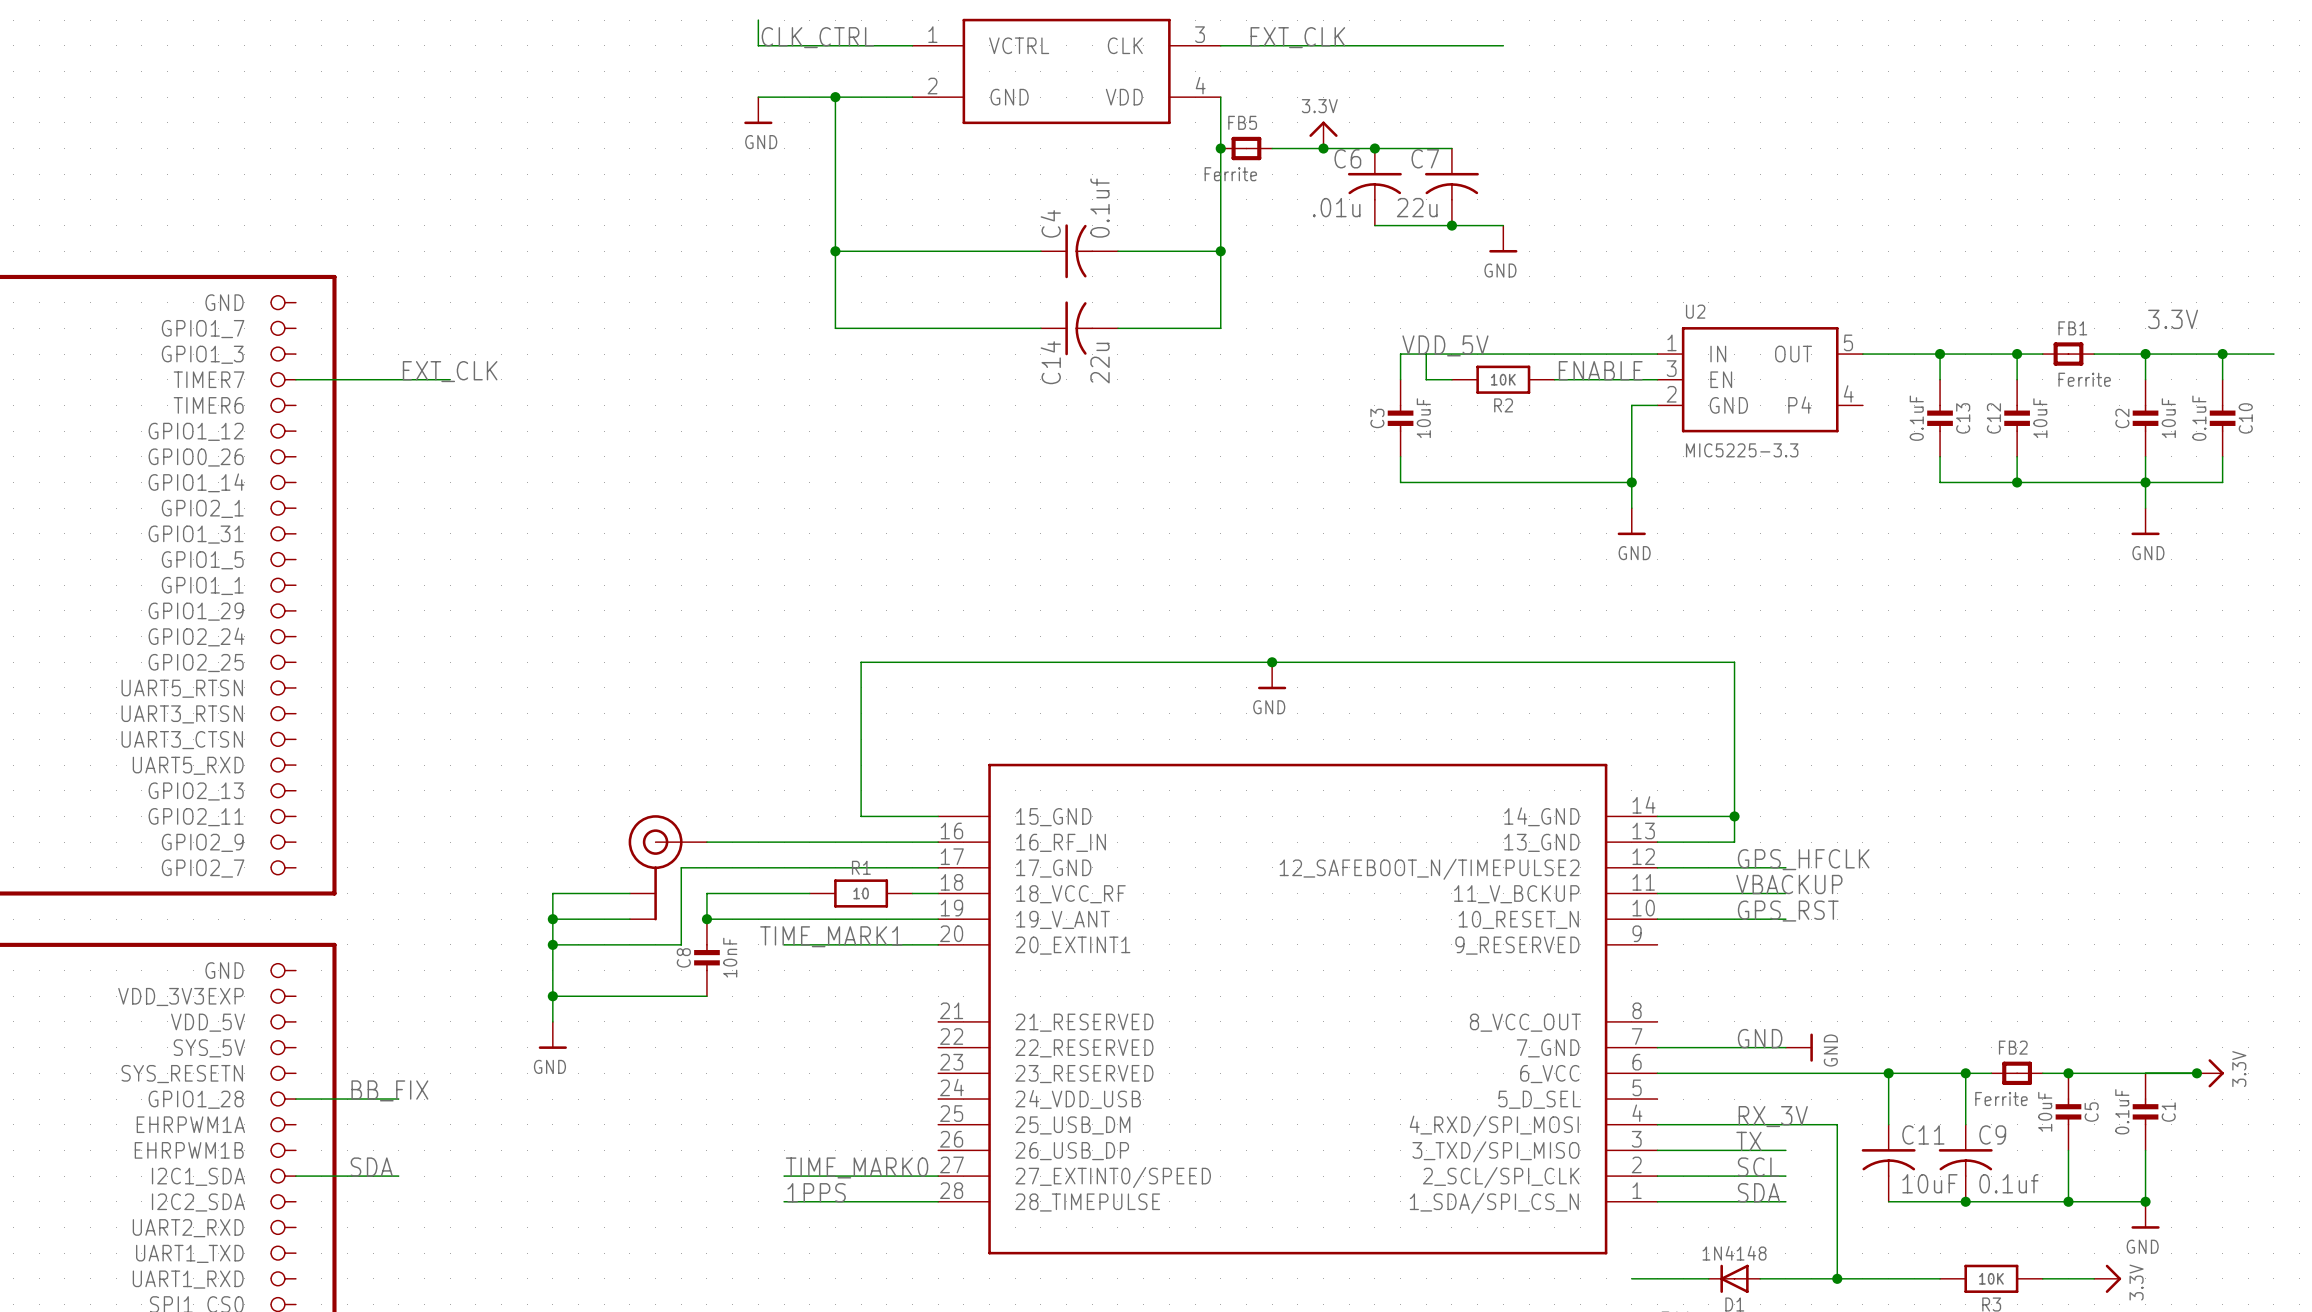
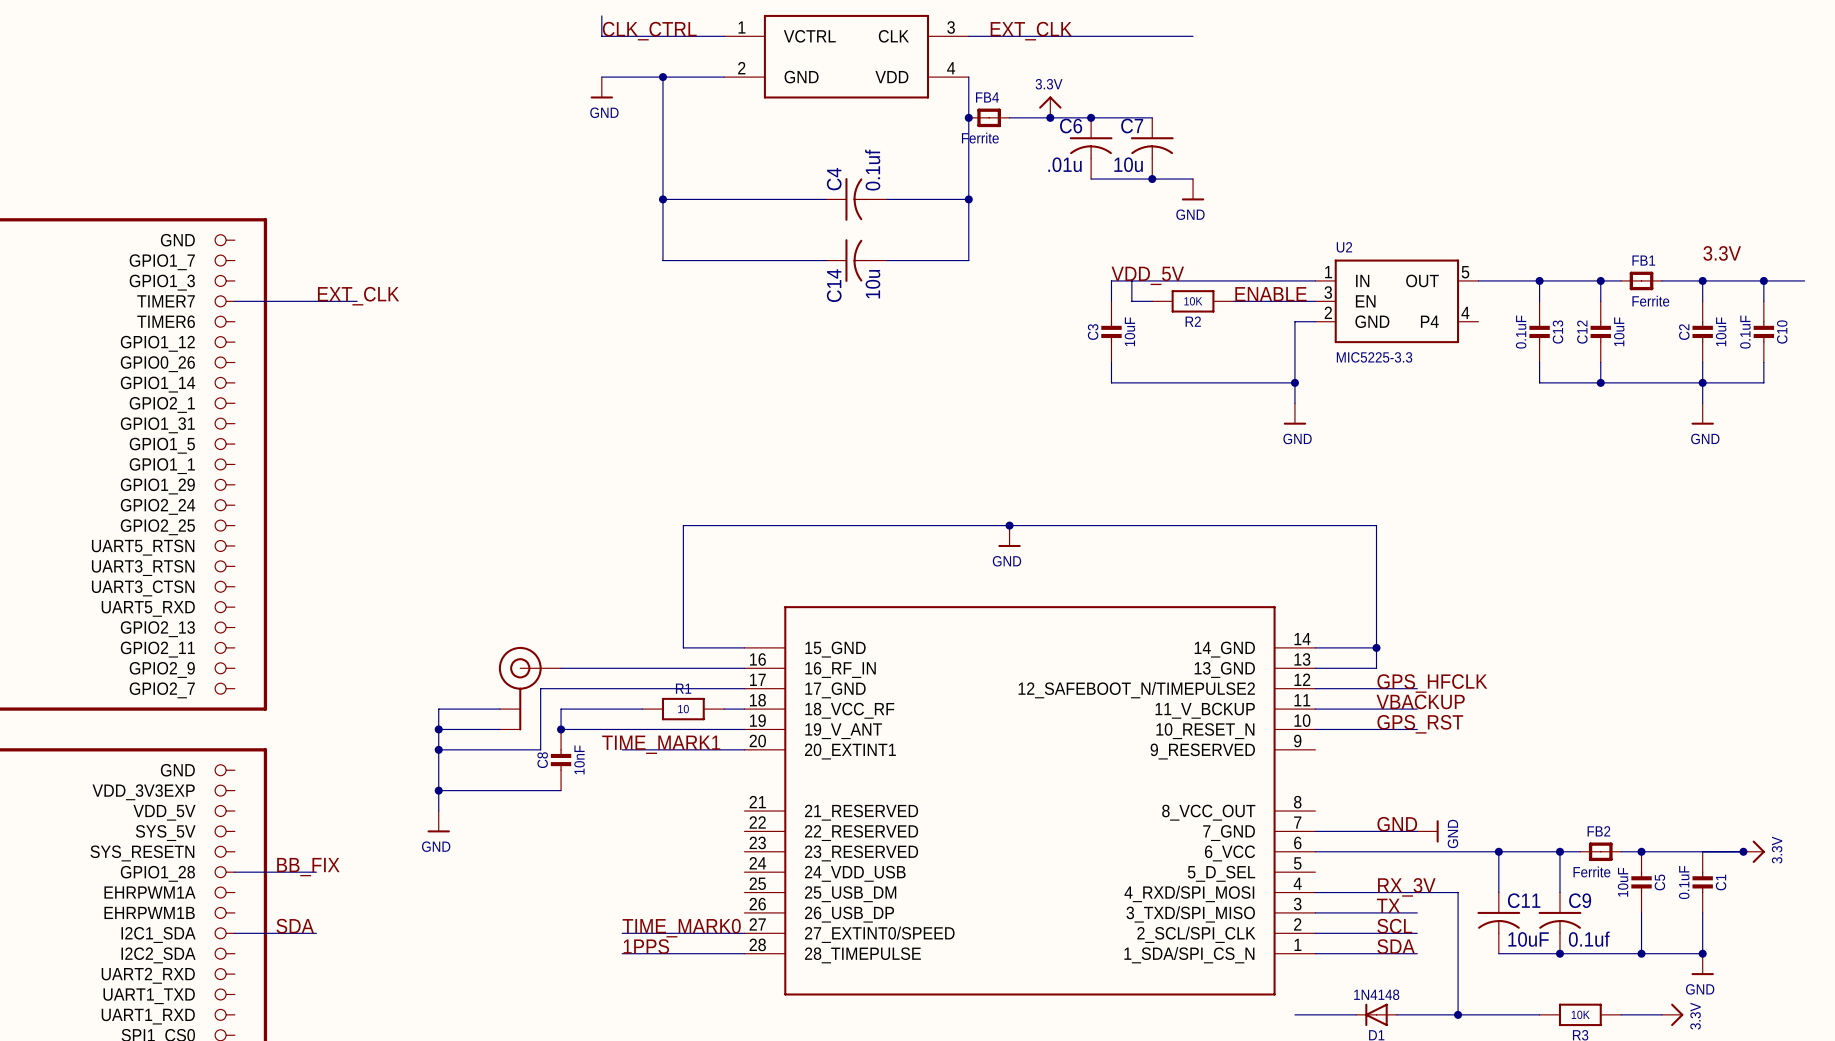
FB5 name: FB5 (1242, 122) -> FB4 (987, 97)
C7 value: 22u (1417, 207) -> 10u (1128, 164)
C14 value: 22u (1100, 363) -> 10u (872, 284)

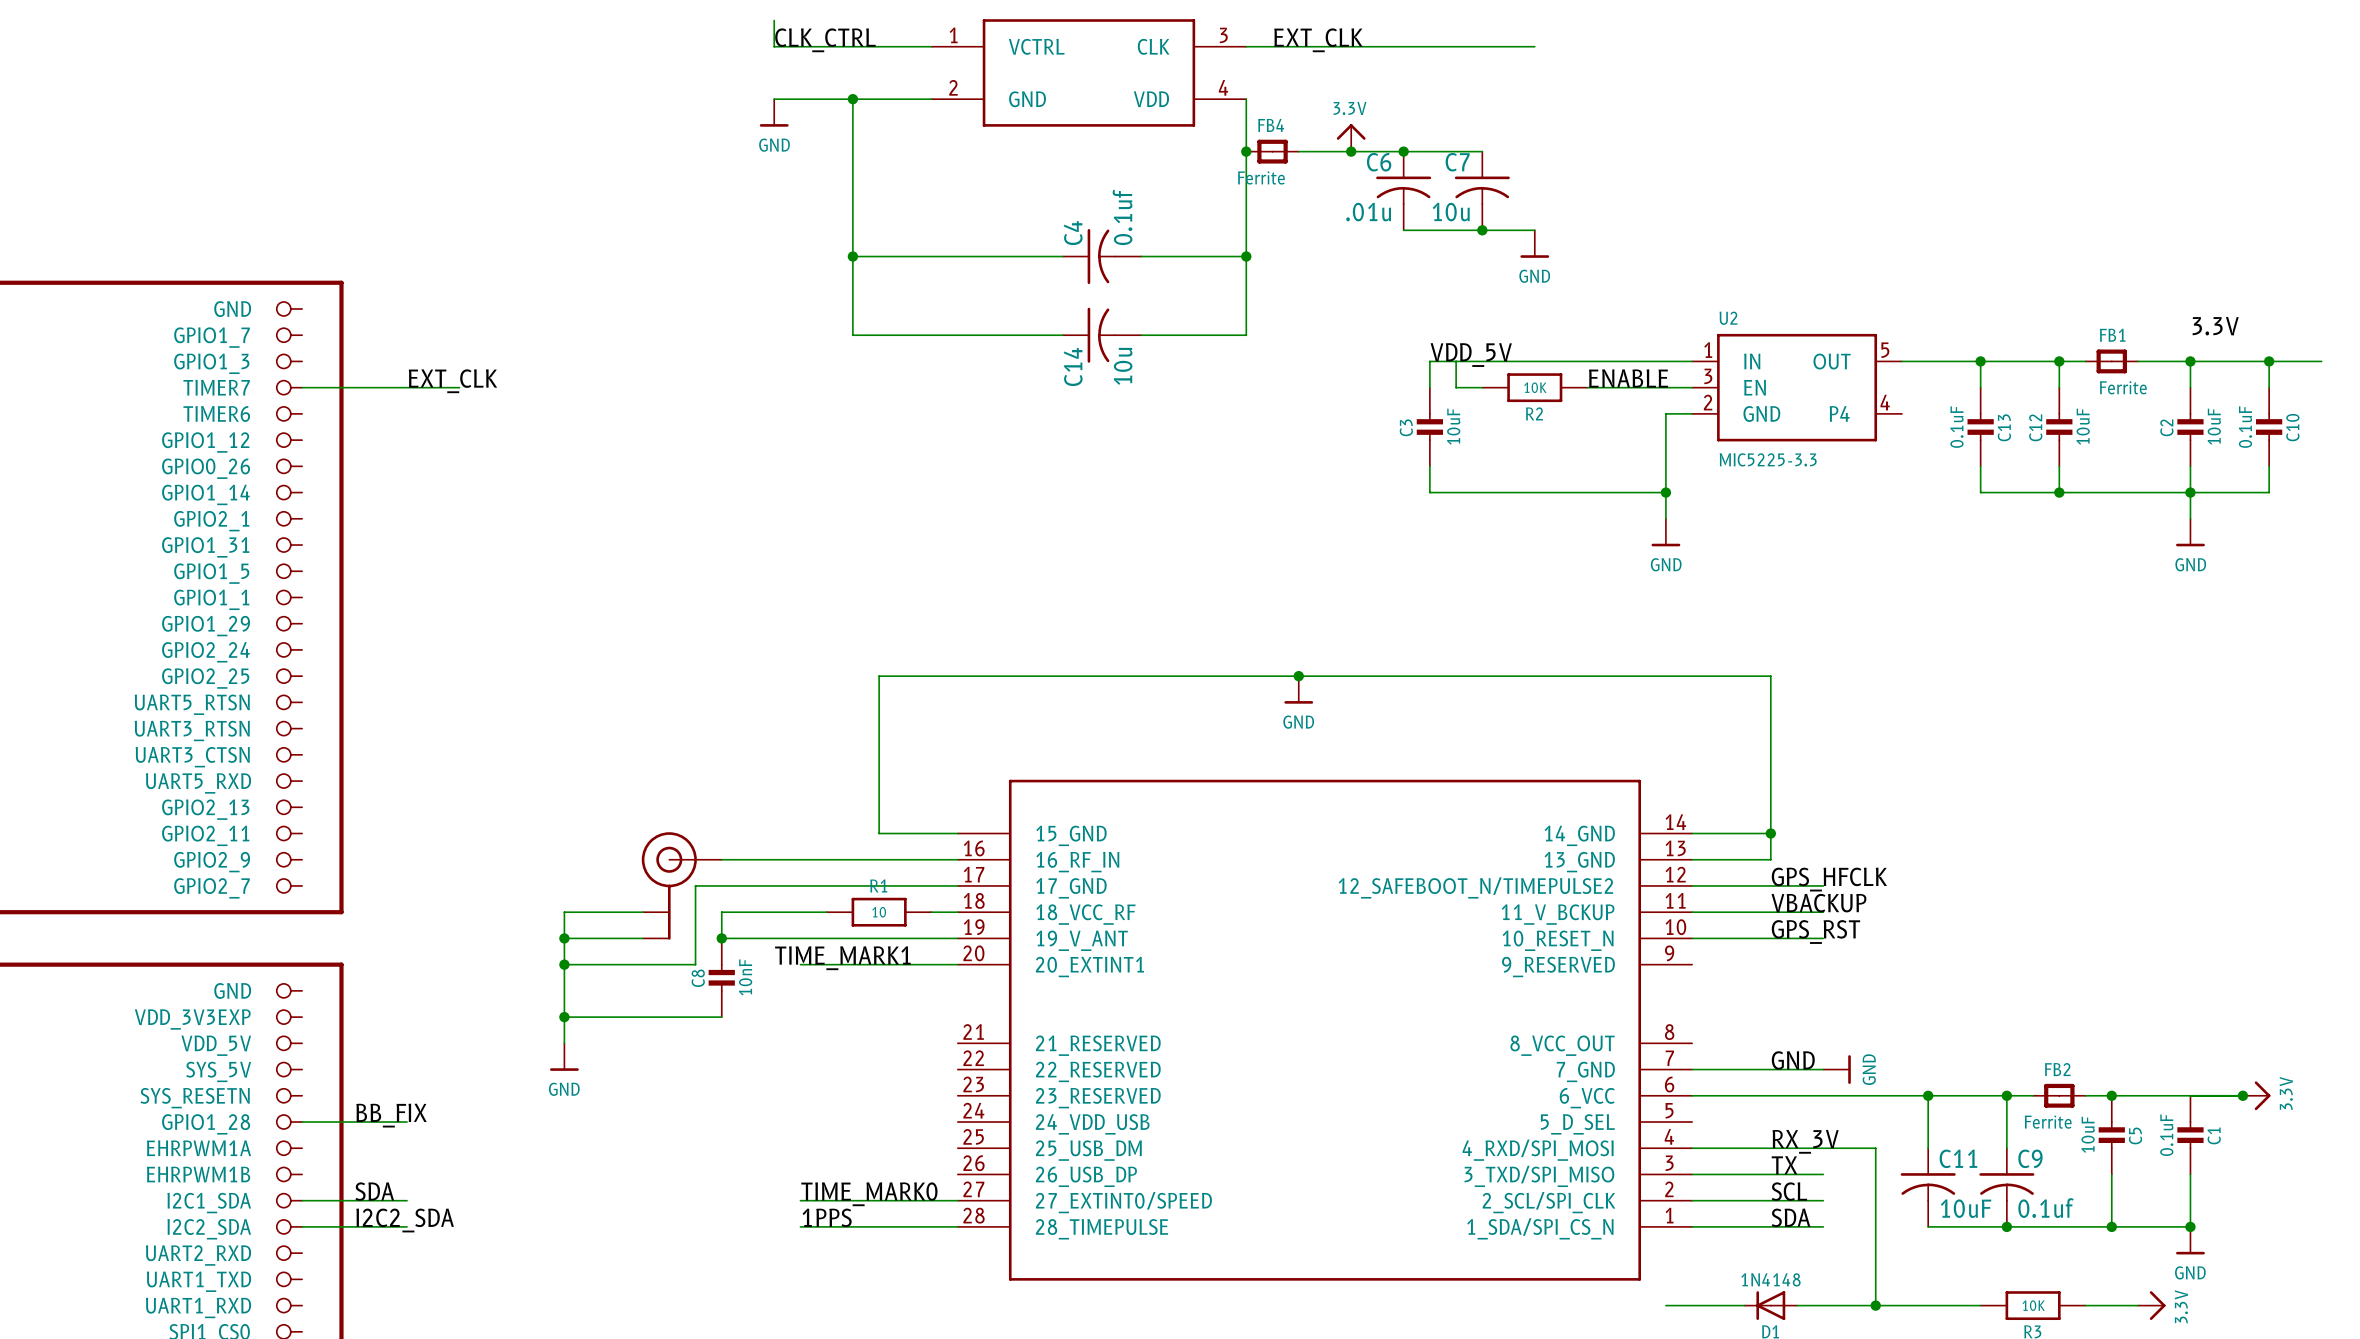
label: none -> I2C2_SDA (405, 1220)
wire: none -> (302, 1226) (407, 1226)

